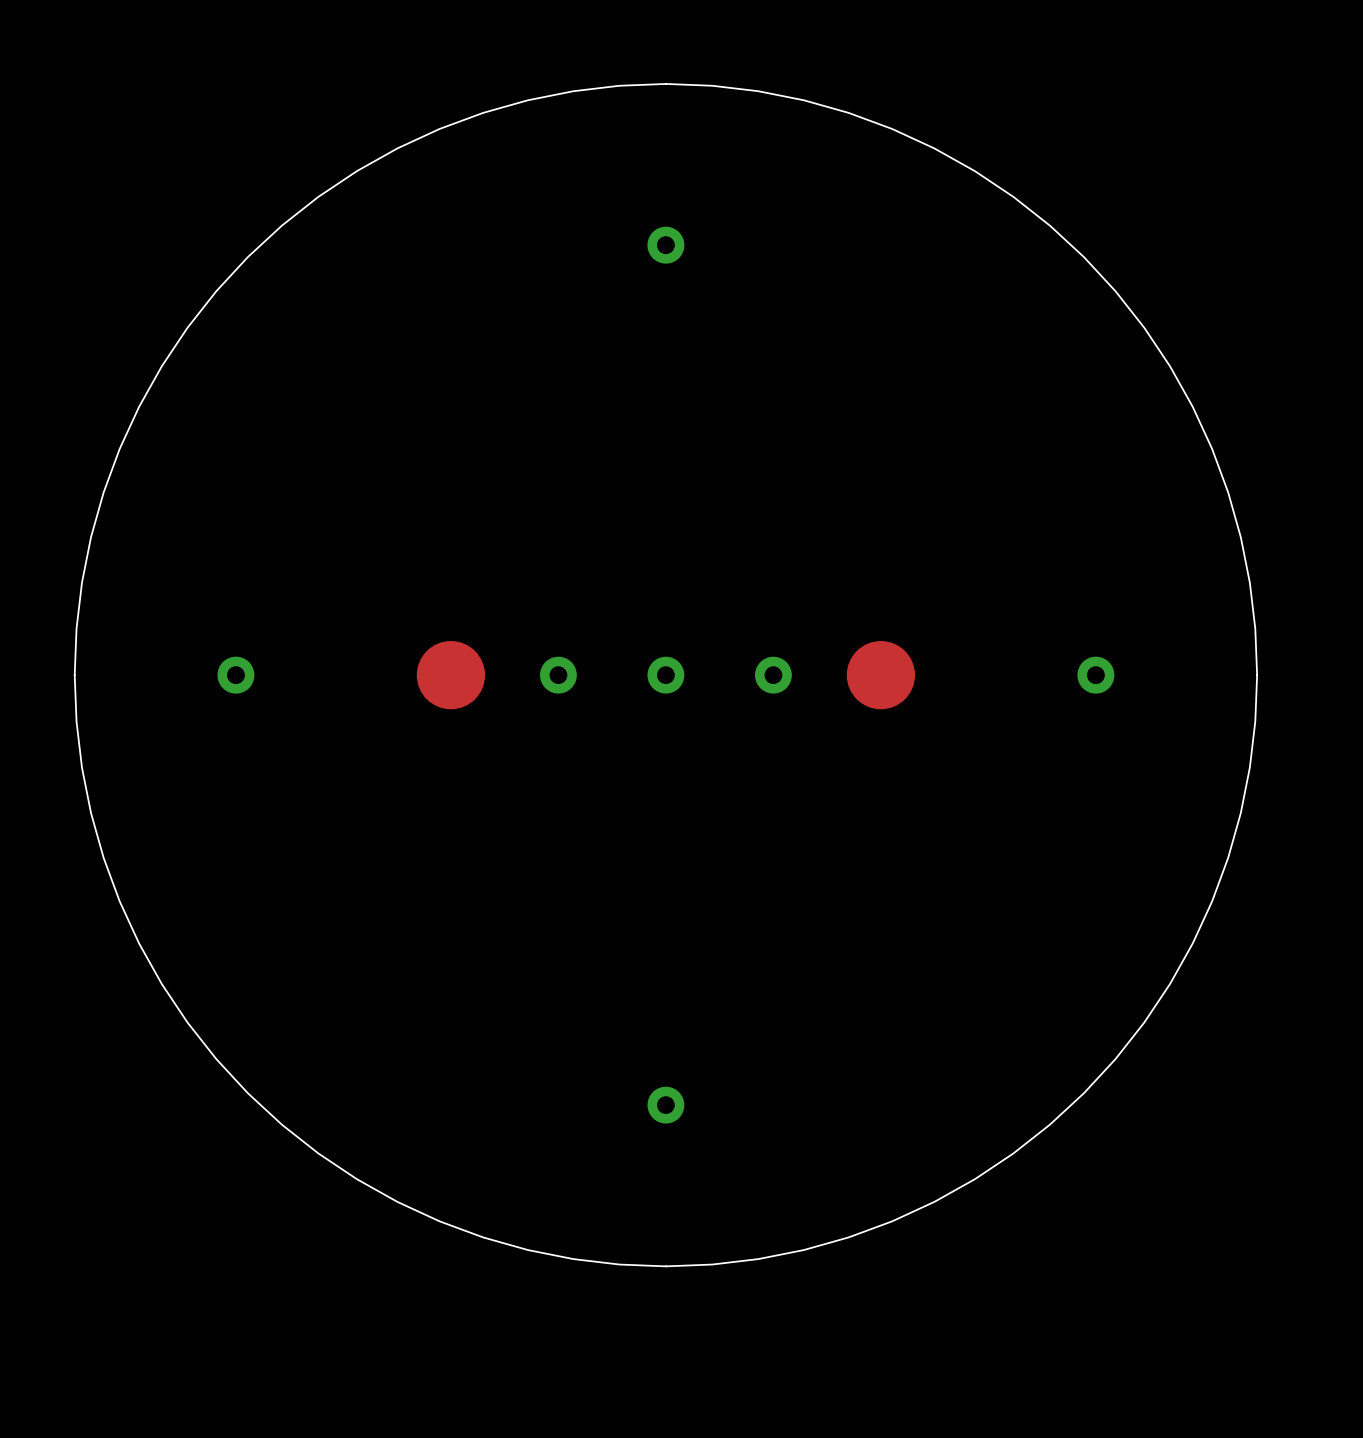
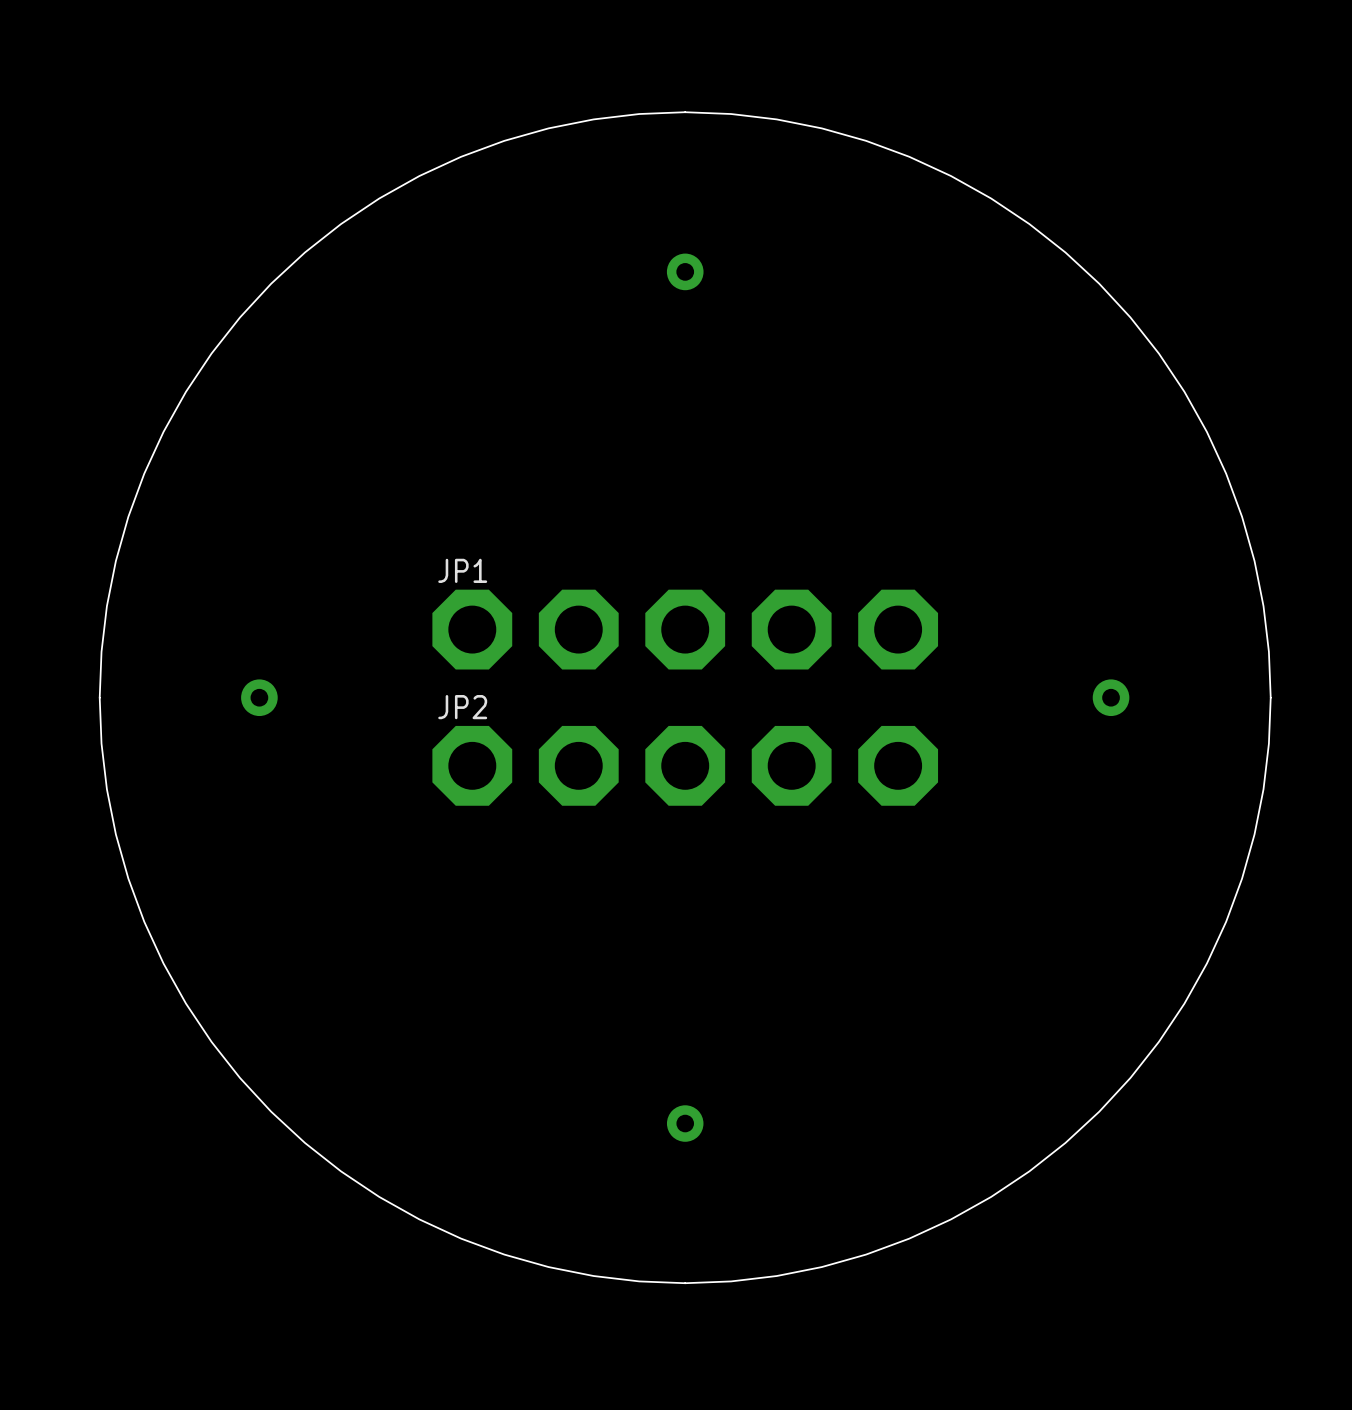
JP1: none -> (685, 629)
part: (450, 675) -> none
part: (558, 675) -> none
part: (665, 675) -> none
part: (773, 675) -> none
part: (880, 675) -> none
JP2: none -> (685, 765)

